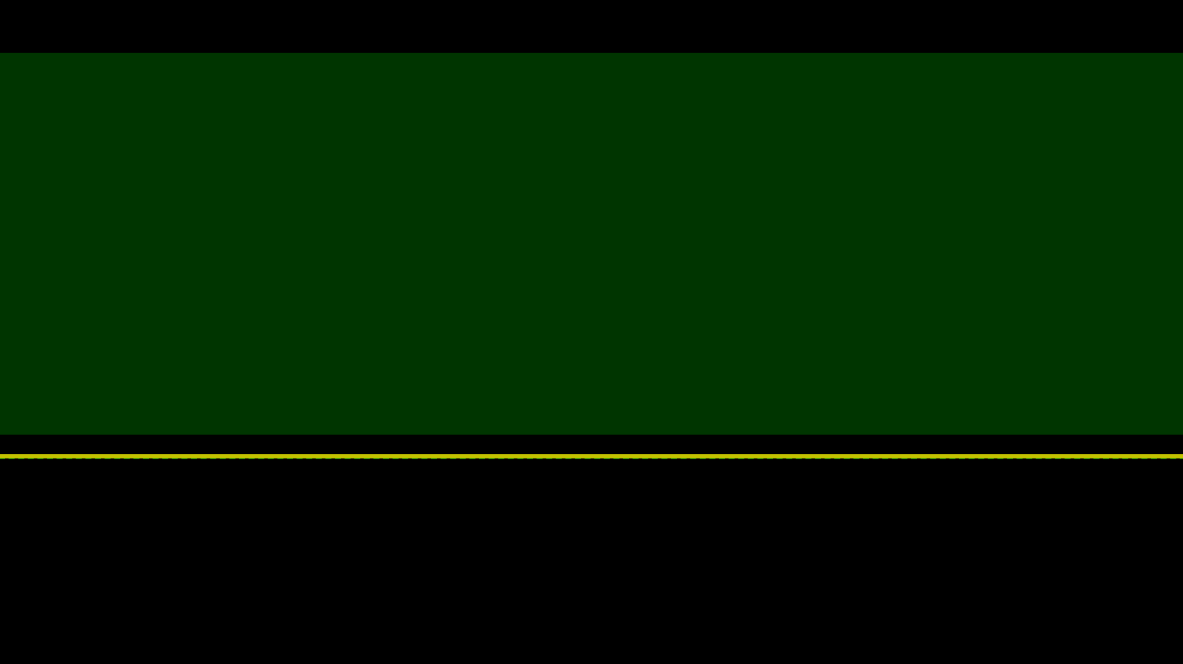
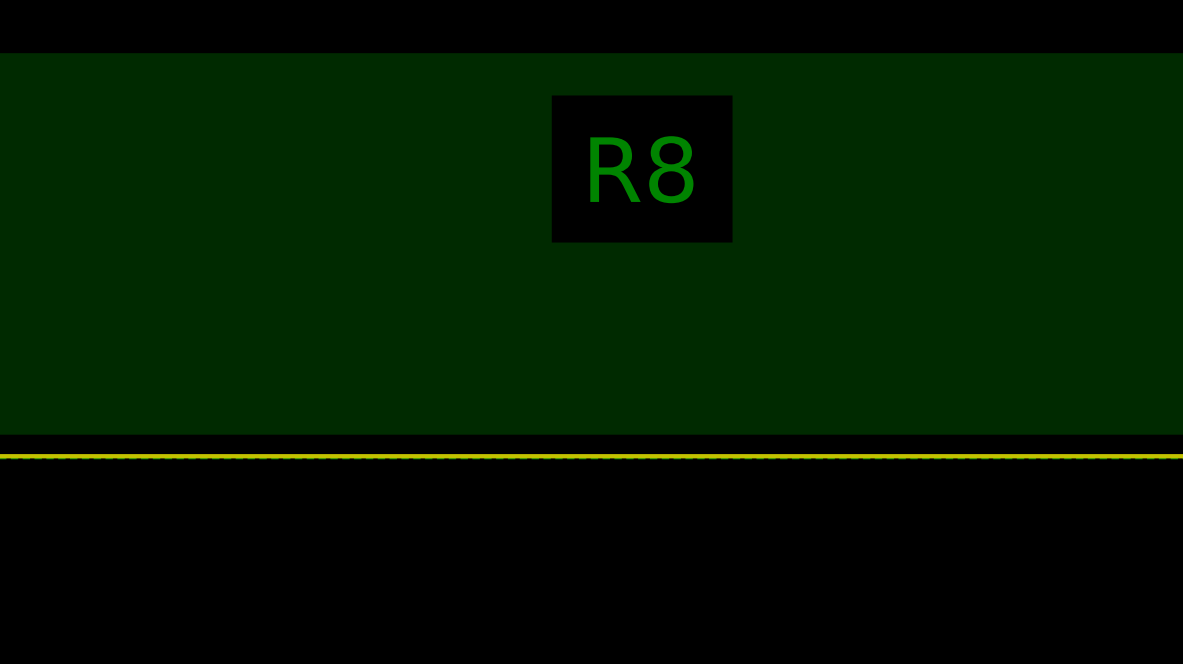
text: none -> R8 (641, 169)

